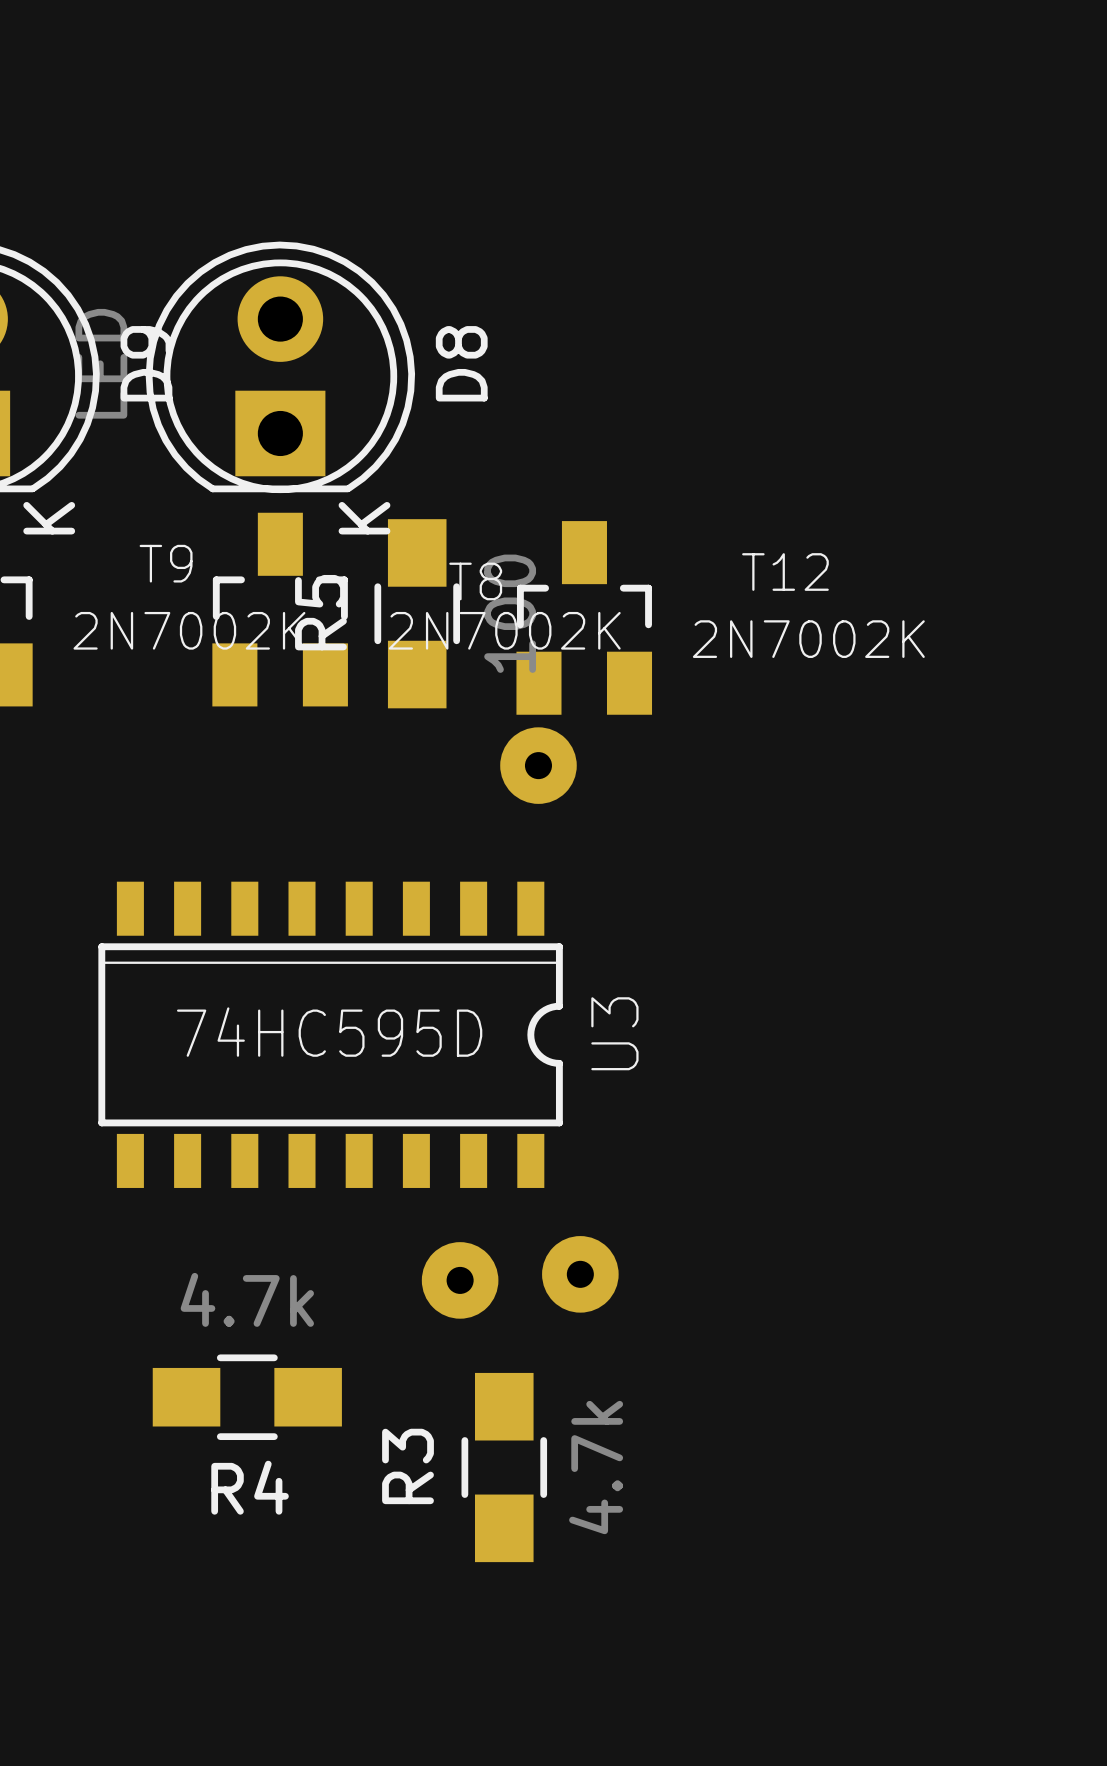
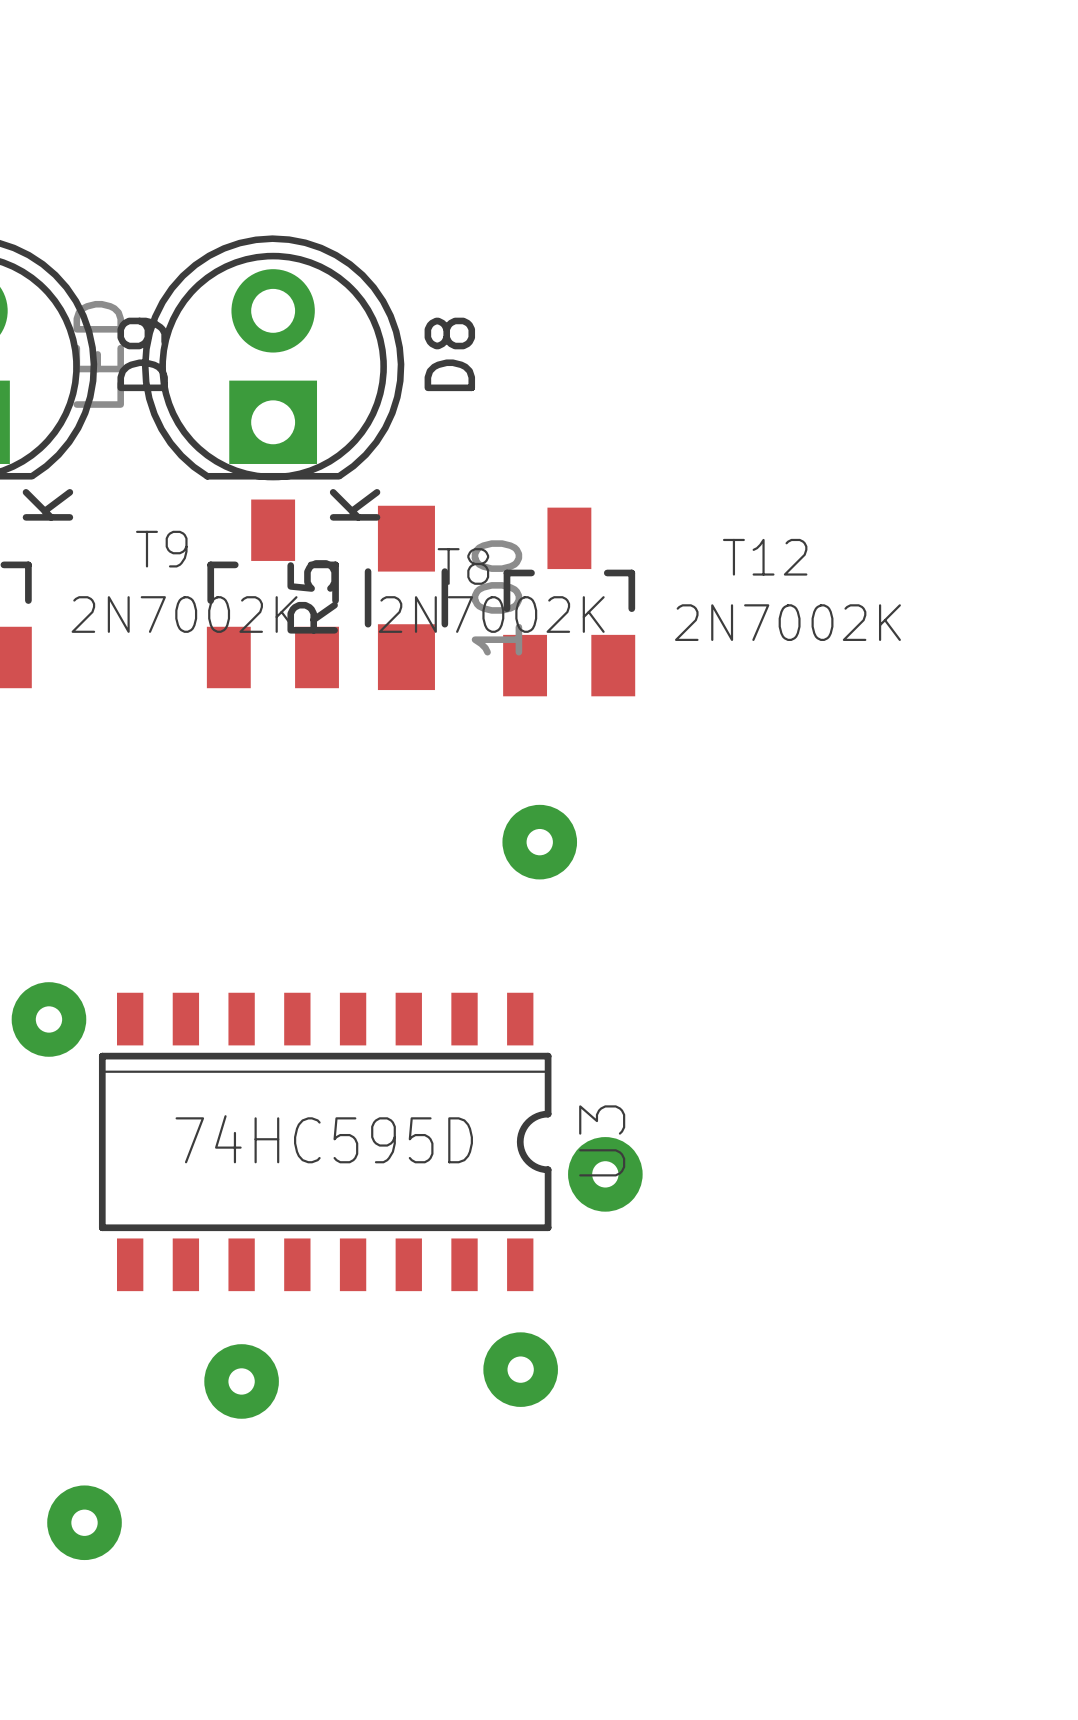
part position: (538, 765) -> (539, 842)
U3 position: (330, 1034) -> (325, 1141)
part: none -> (48, 1019)
part: none -> (605, 1174)
part: (580, 1274) -> none
part: (460, 1280) -> none
R4: 4.7k (247, 1397) -> none
part: none -> (520, 1369)
part: none -> (241, 1381)
R3: 4.7k (504, 1467) -> none
part: none -> (84, 1522)

